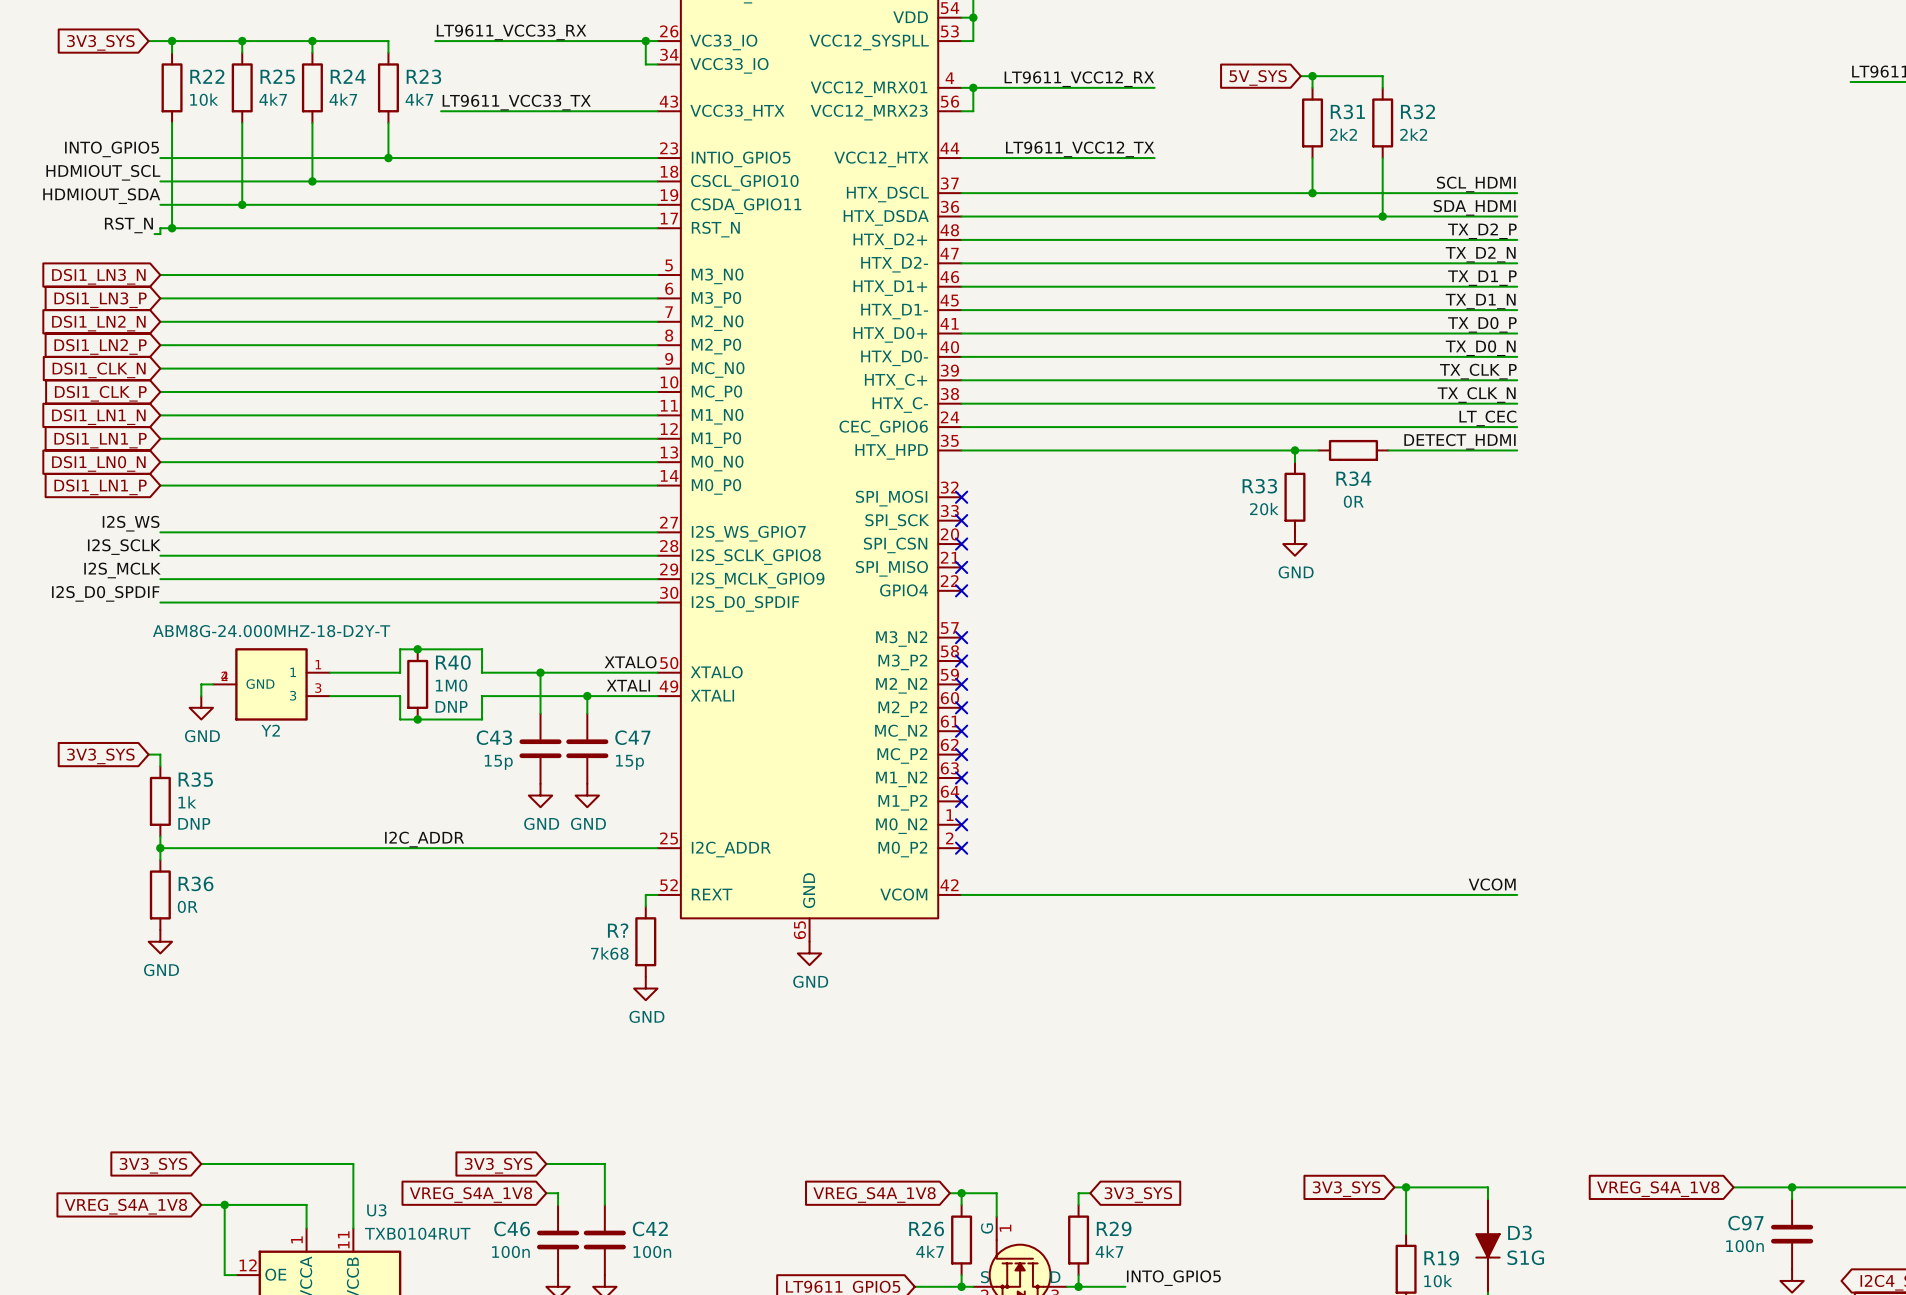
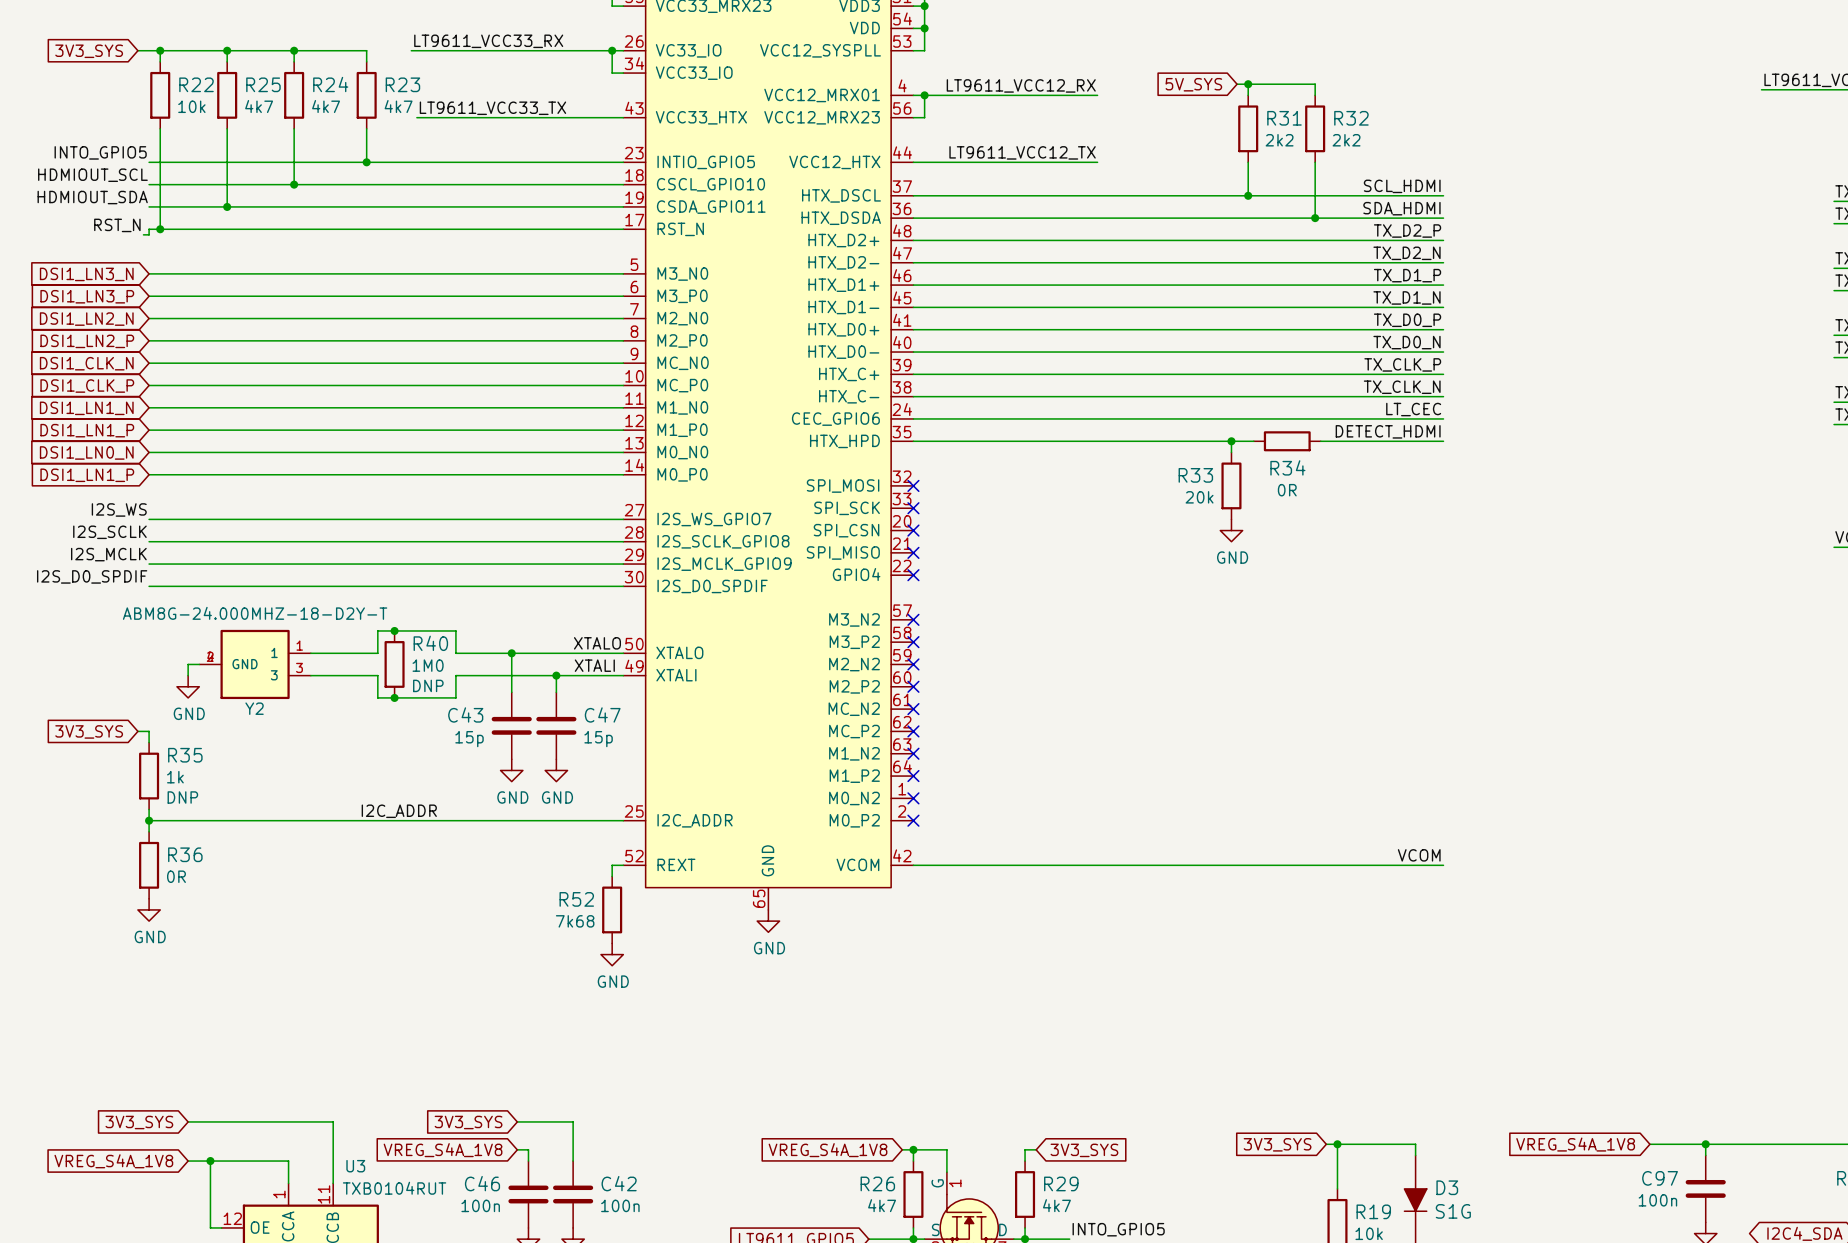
R? name: R? (618, 930) -> R52 (576, 899)

